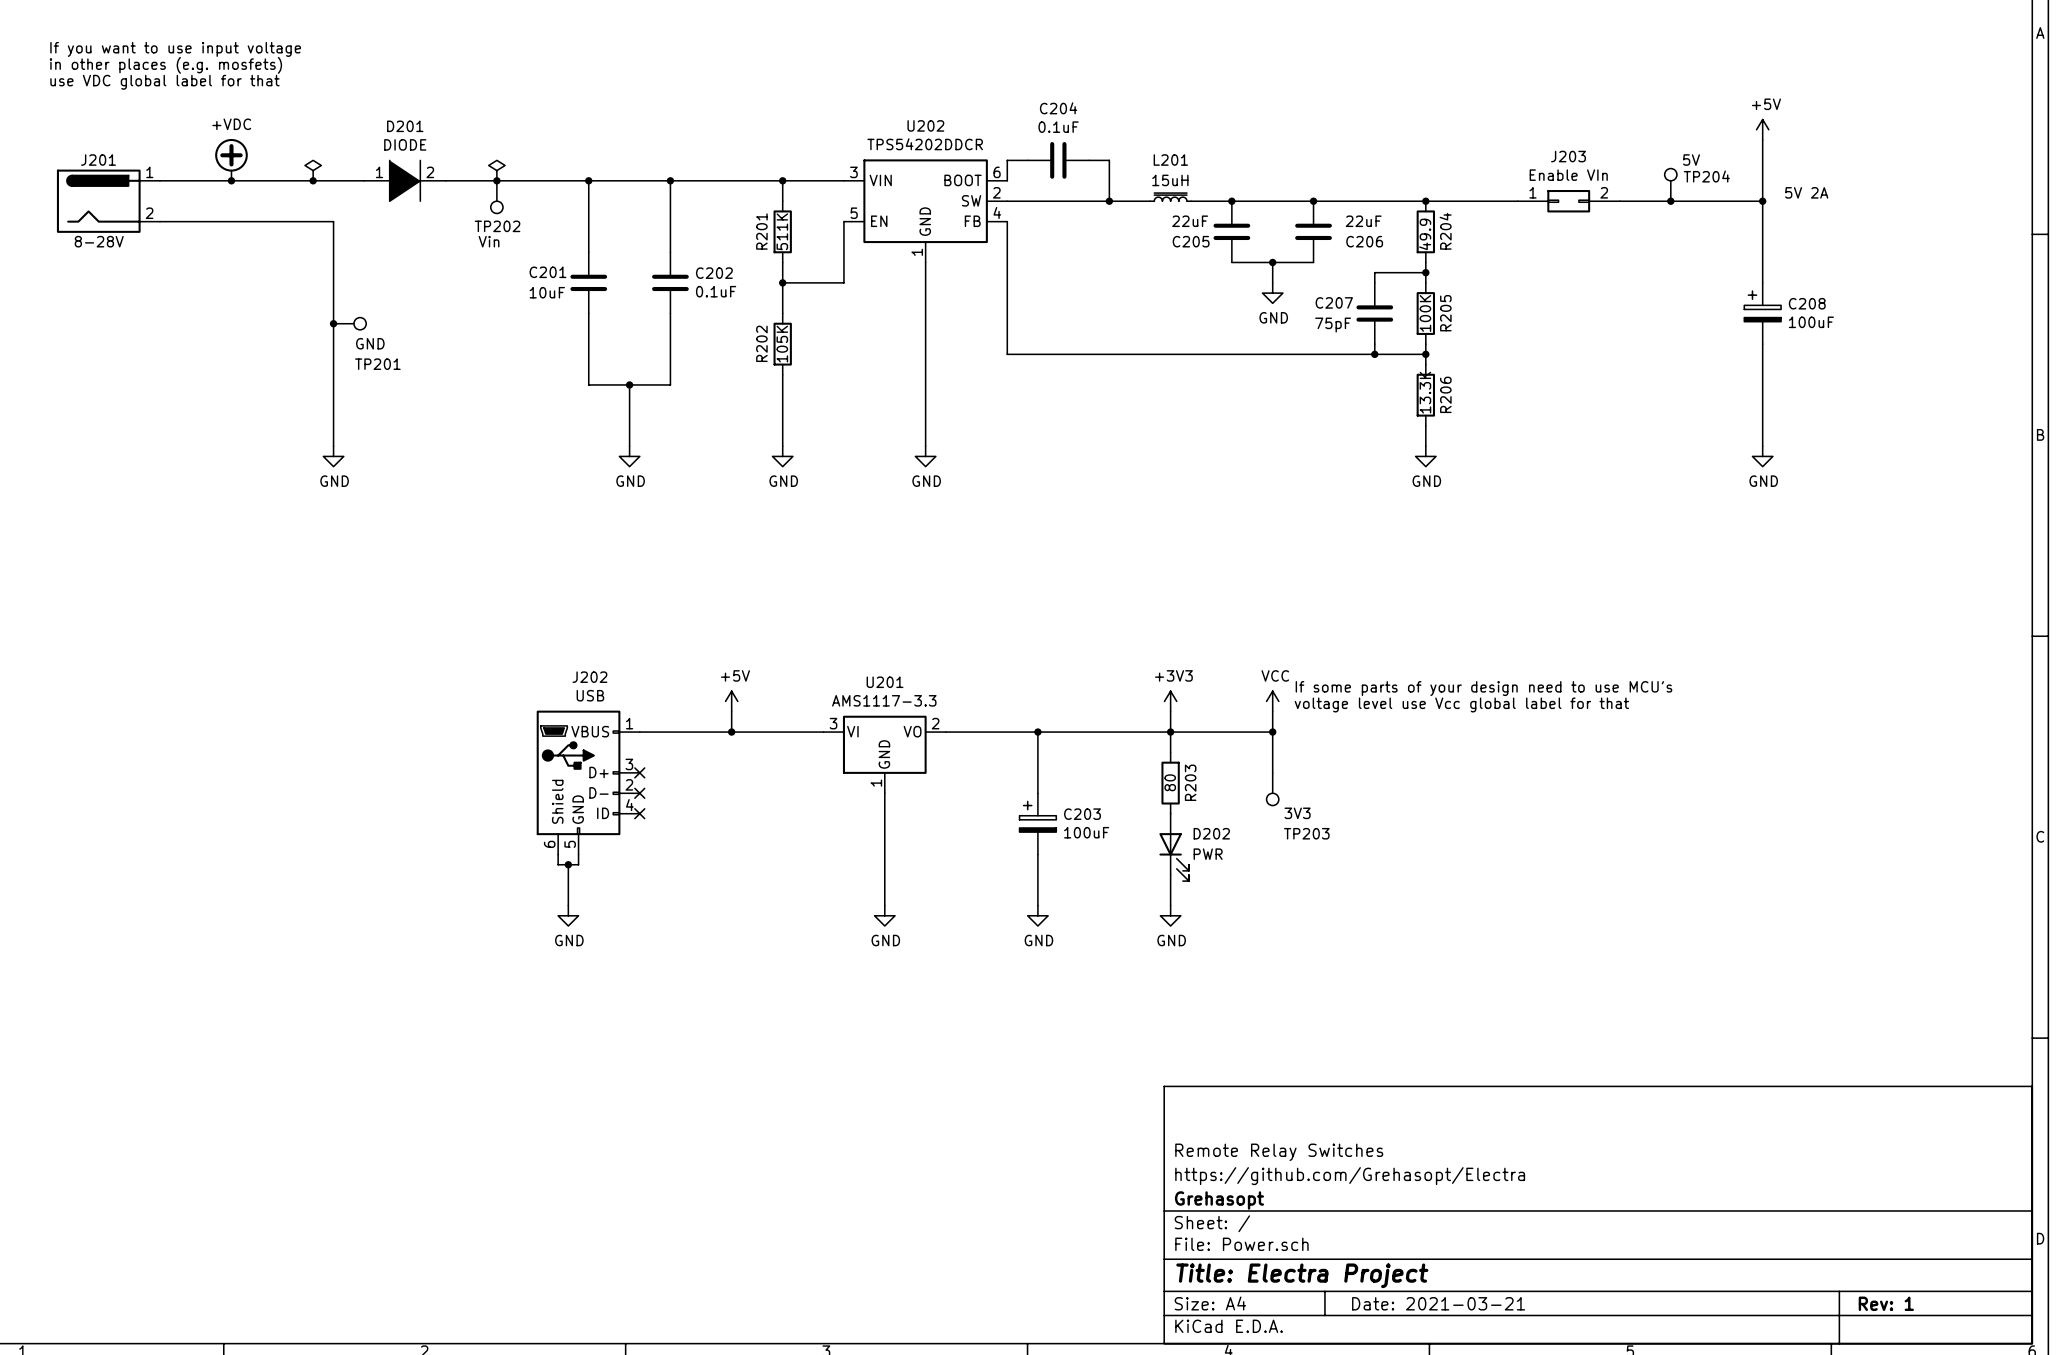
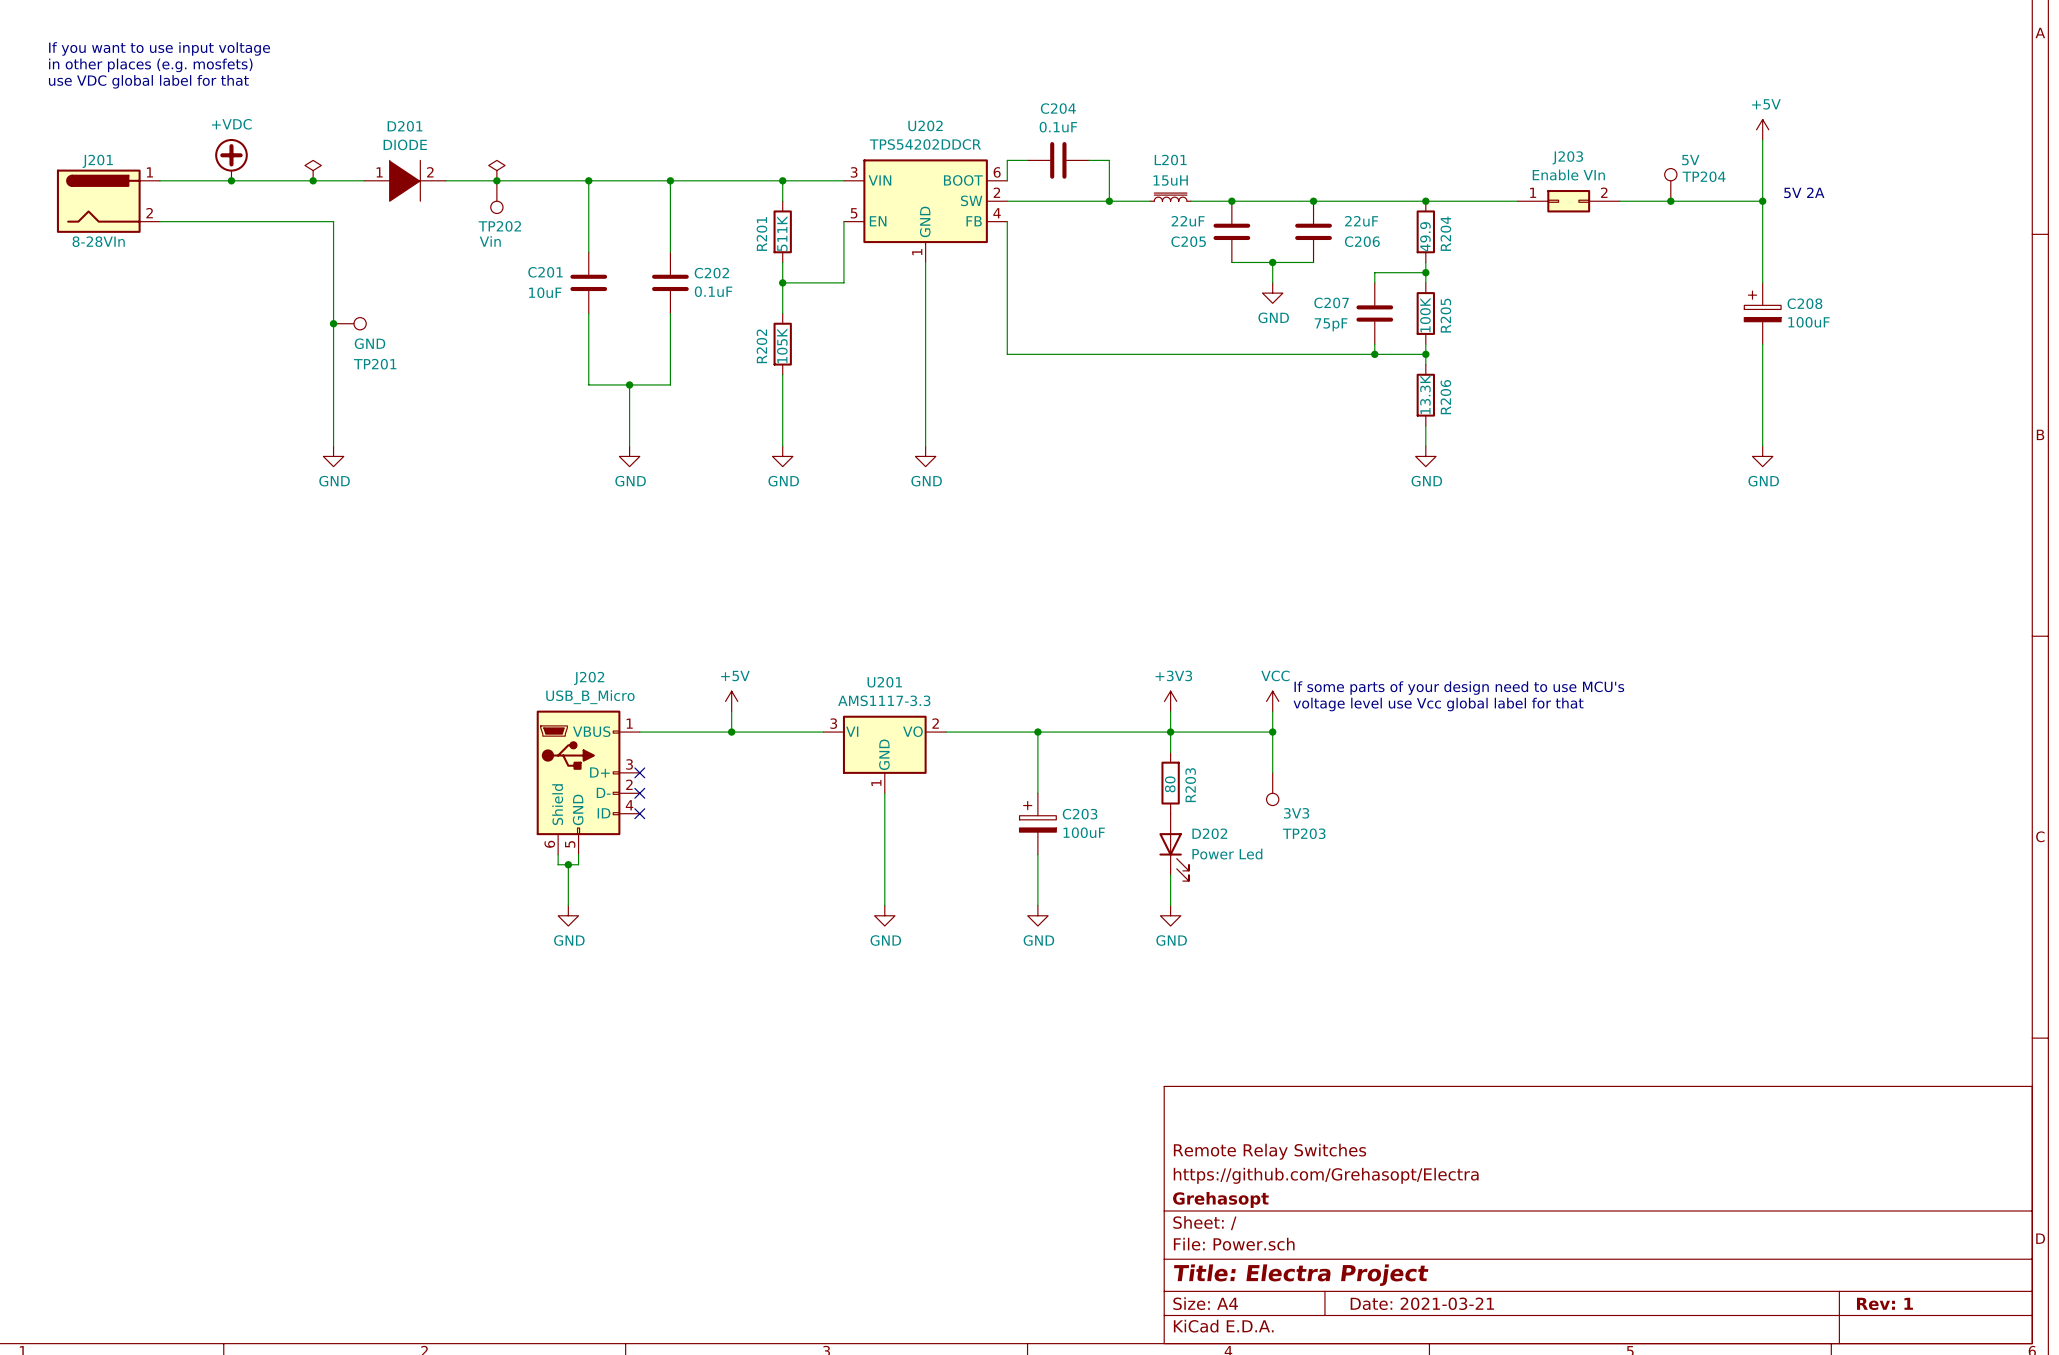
J201 value: 8-28V (99, 241) -> 8-28VIn (98, 241)
J202 value: USB (590, 695) -> USB_B_Micro (590, 697)
D202 value: PWR (1208, 854) -> Power Led (1227, 854)

